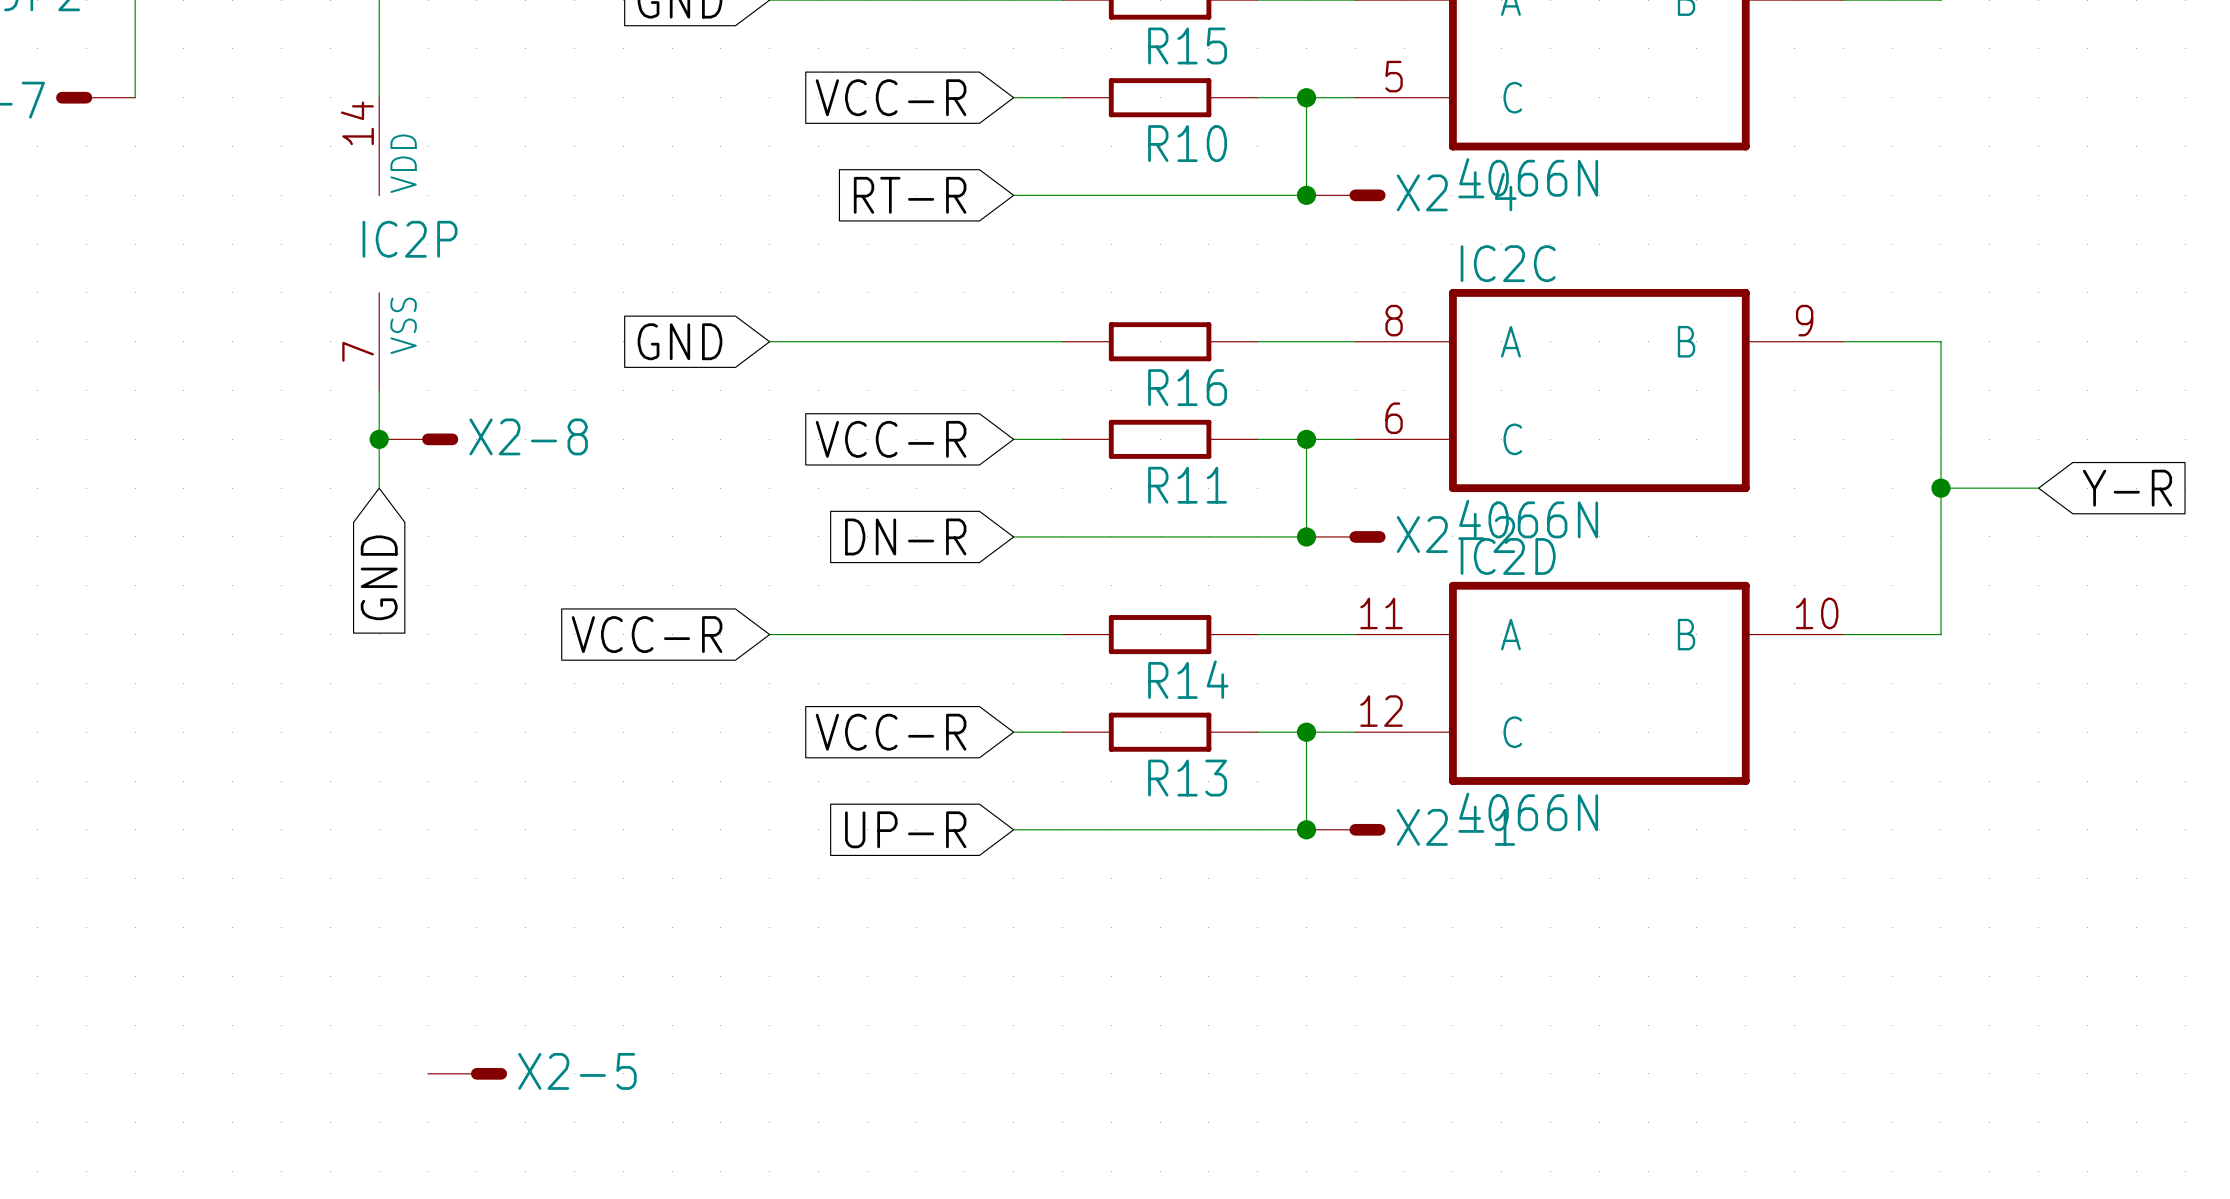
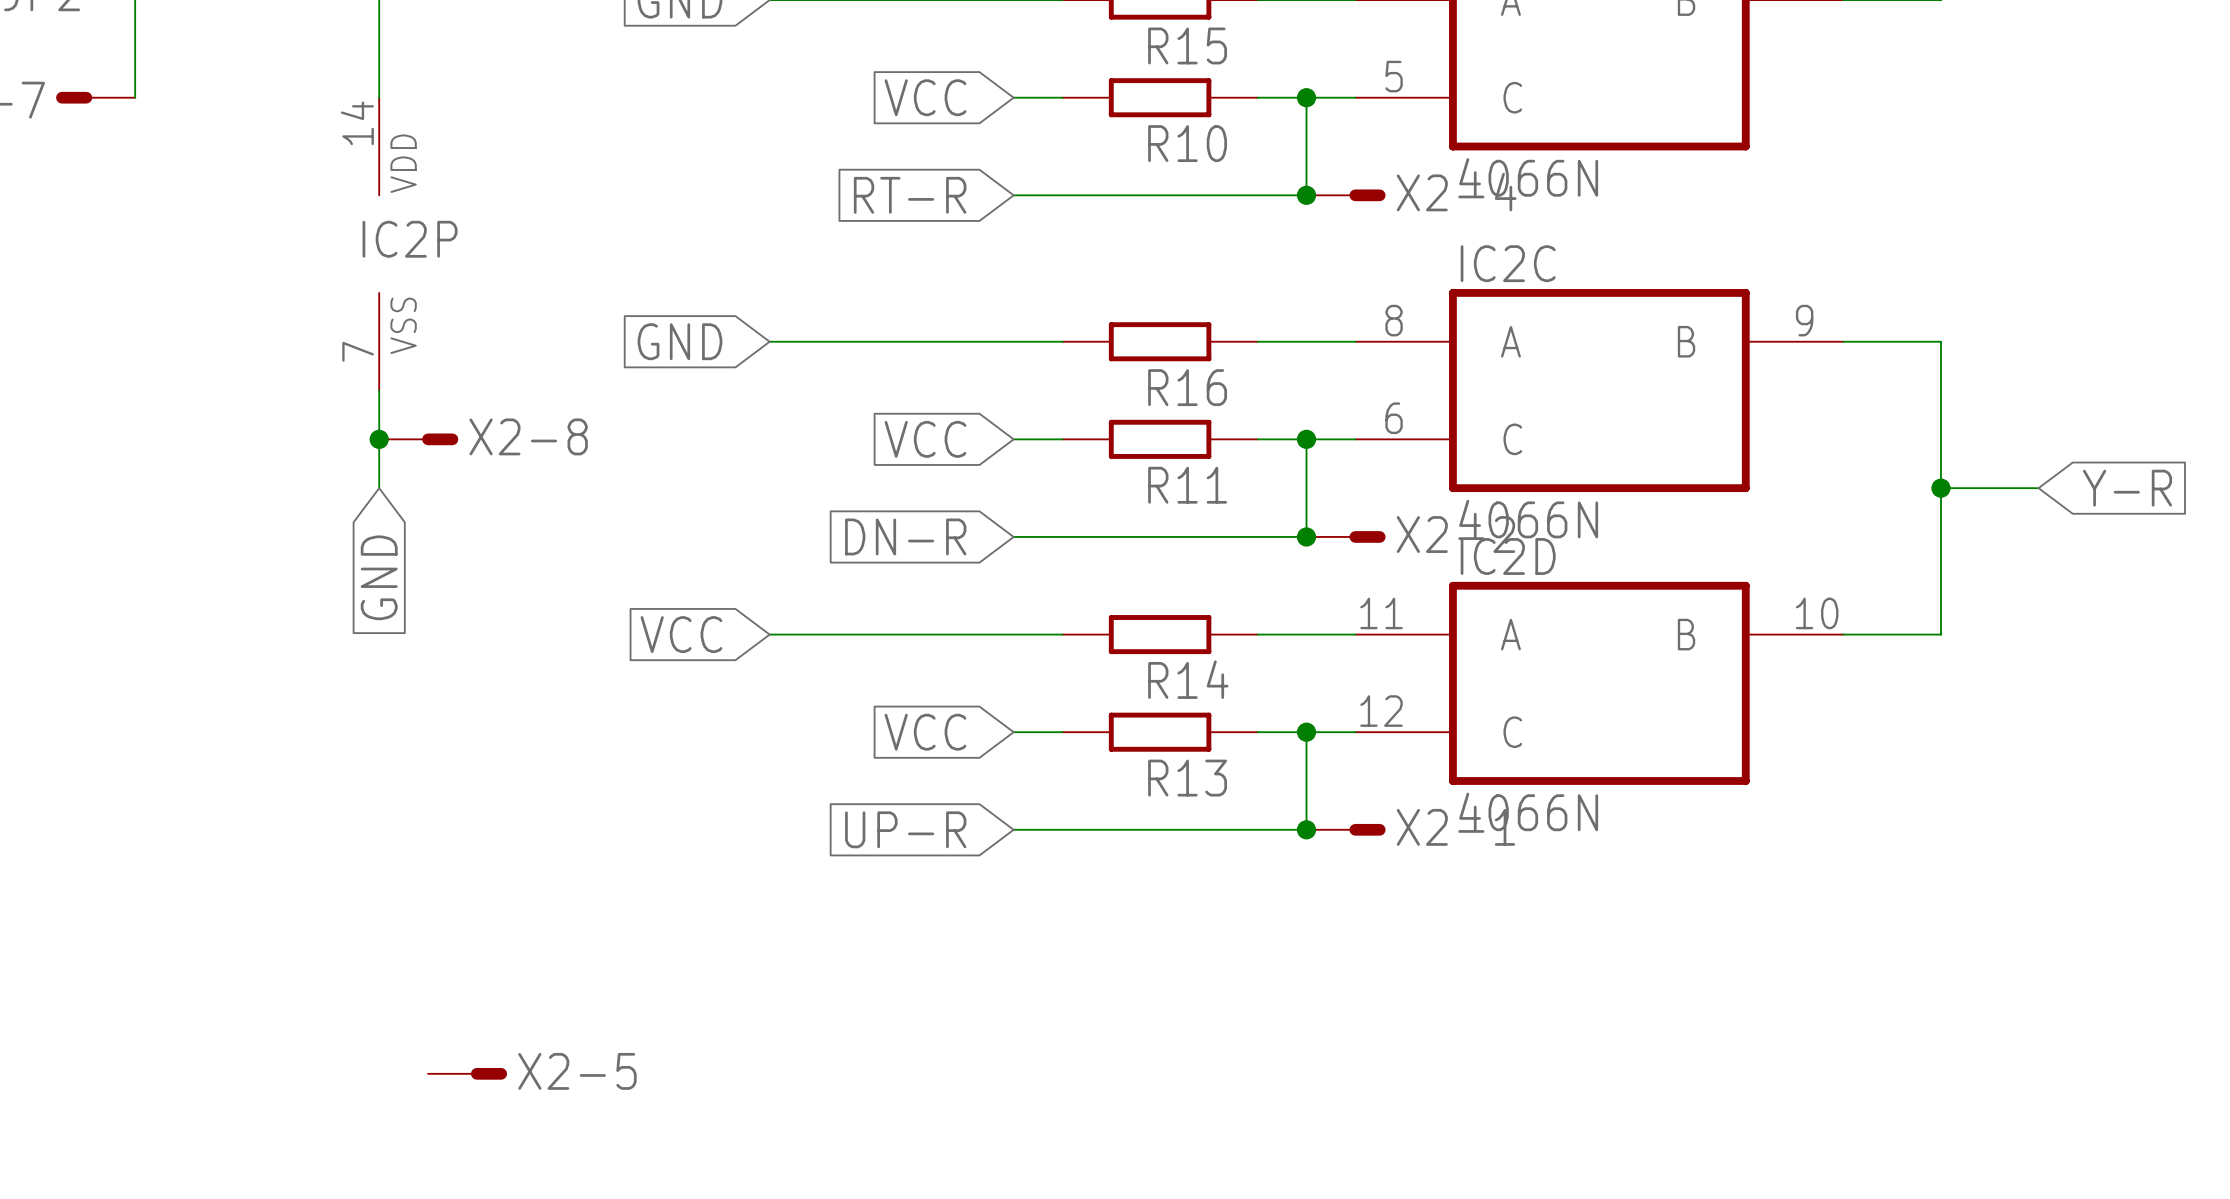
global label: VCC-R (891, 97) -> VCC (925, 97)
global label: VCC-R (891, 439) -> VCC (925, 439)
global label: VCC-R (647, 634) -> VCC (681, 634)
global label: VCC-R (891, 732) -> VCC (925, 732)

